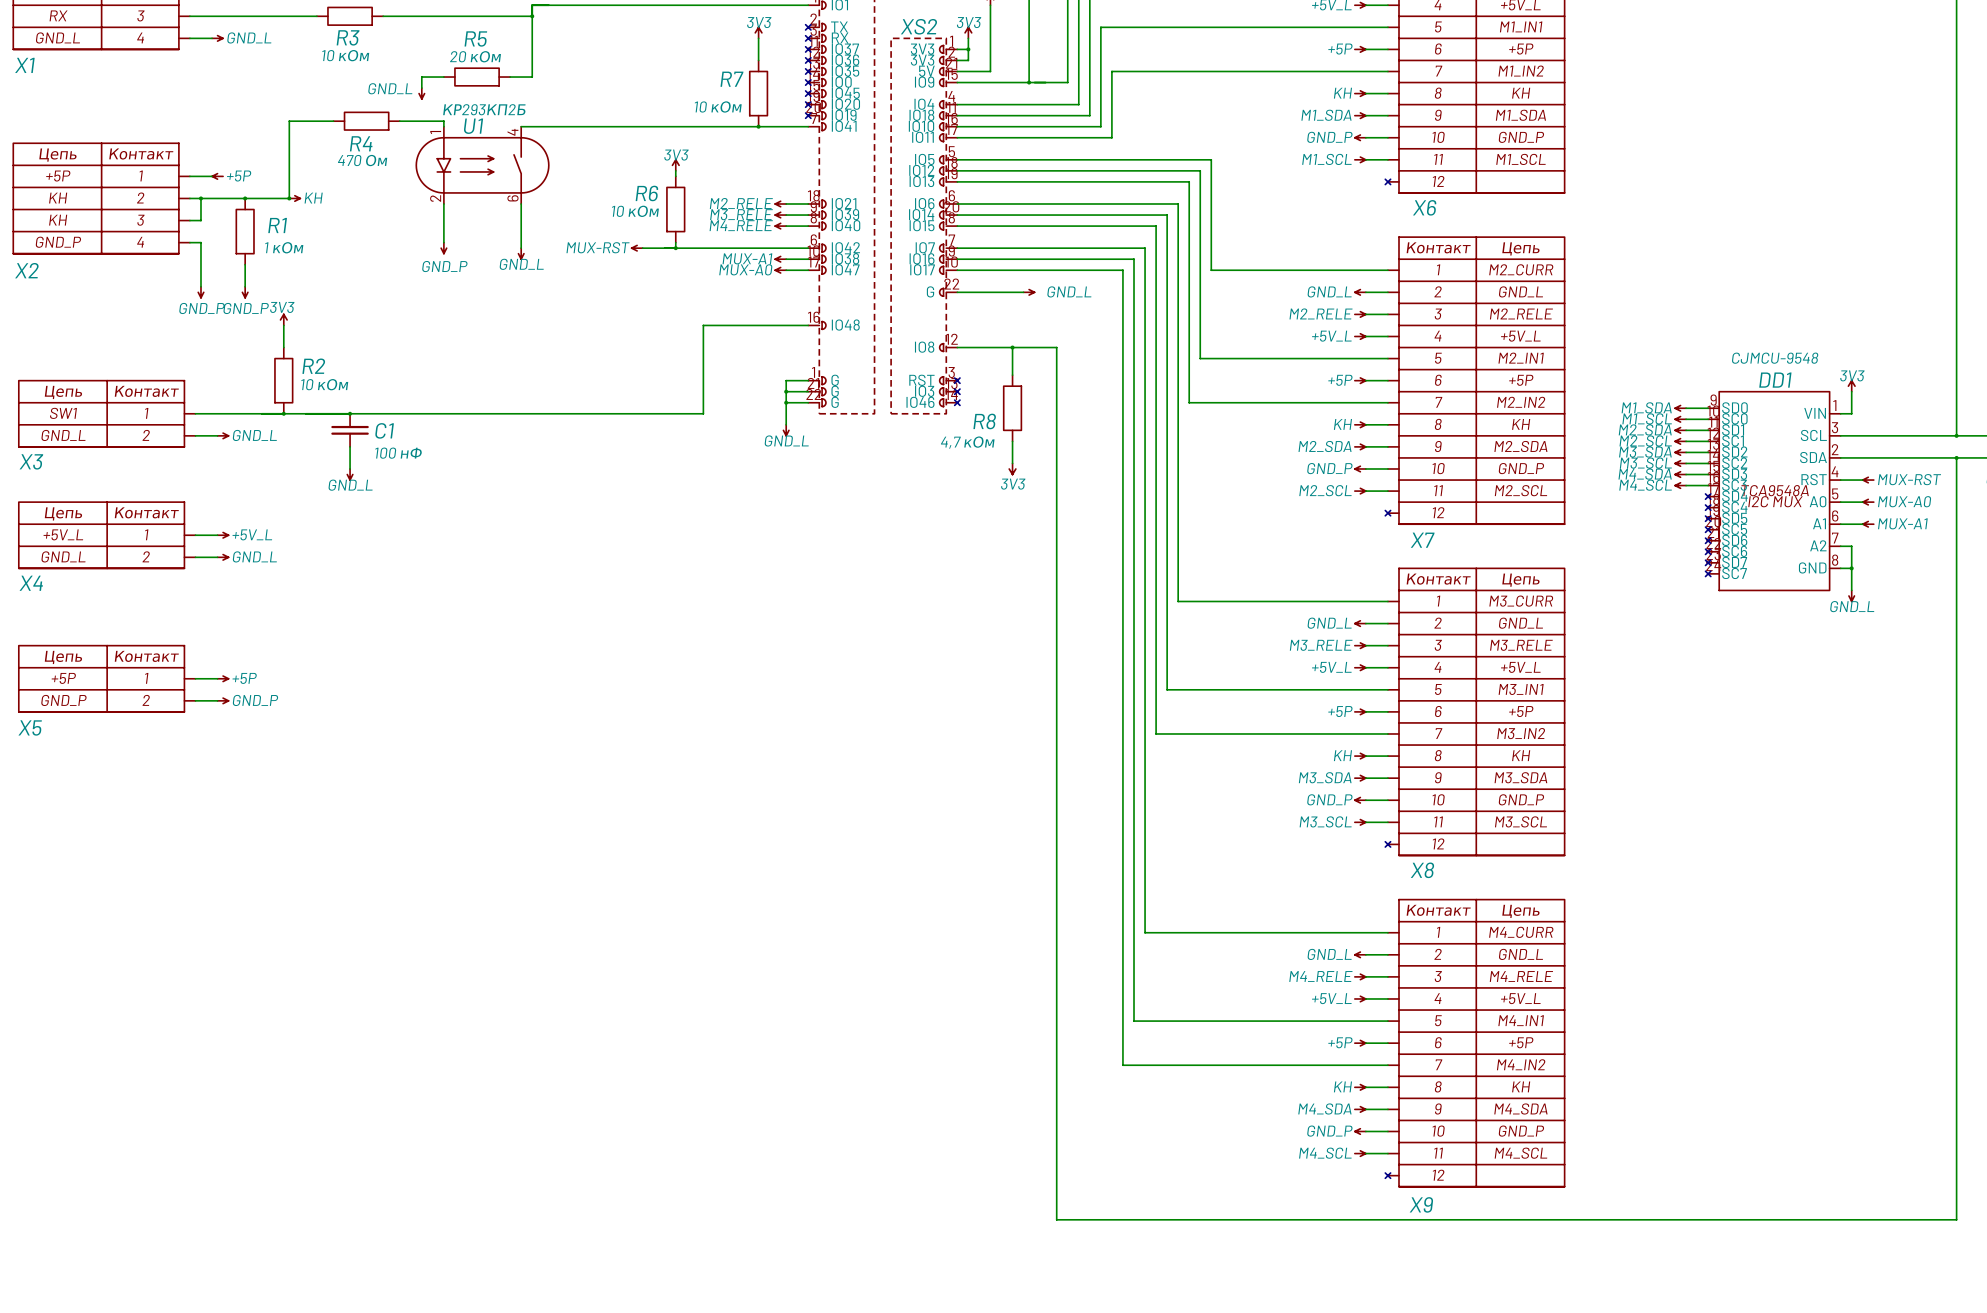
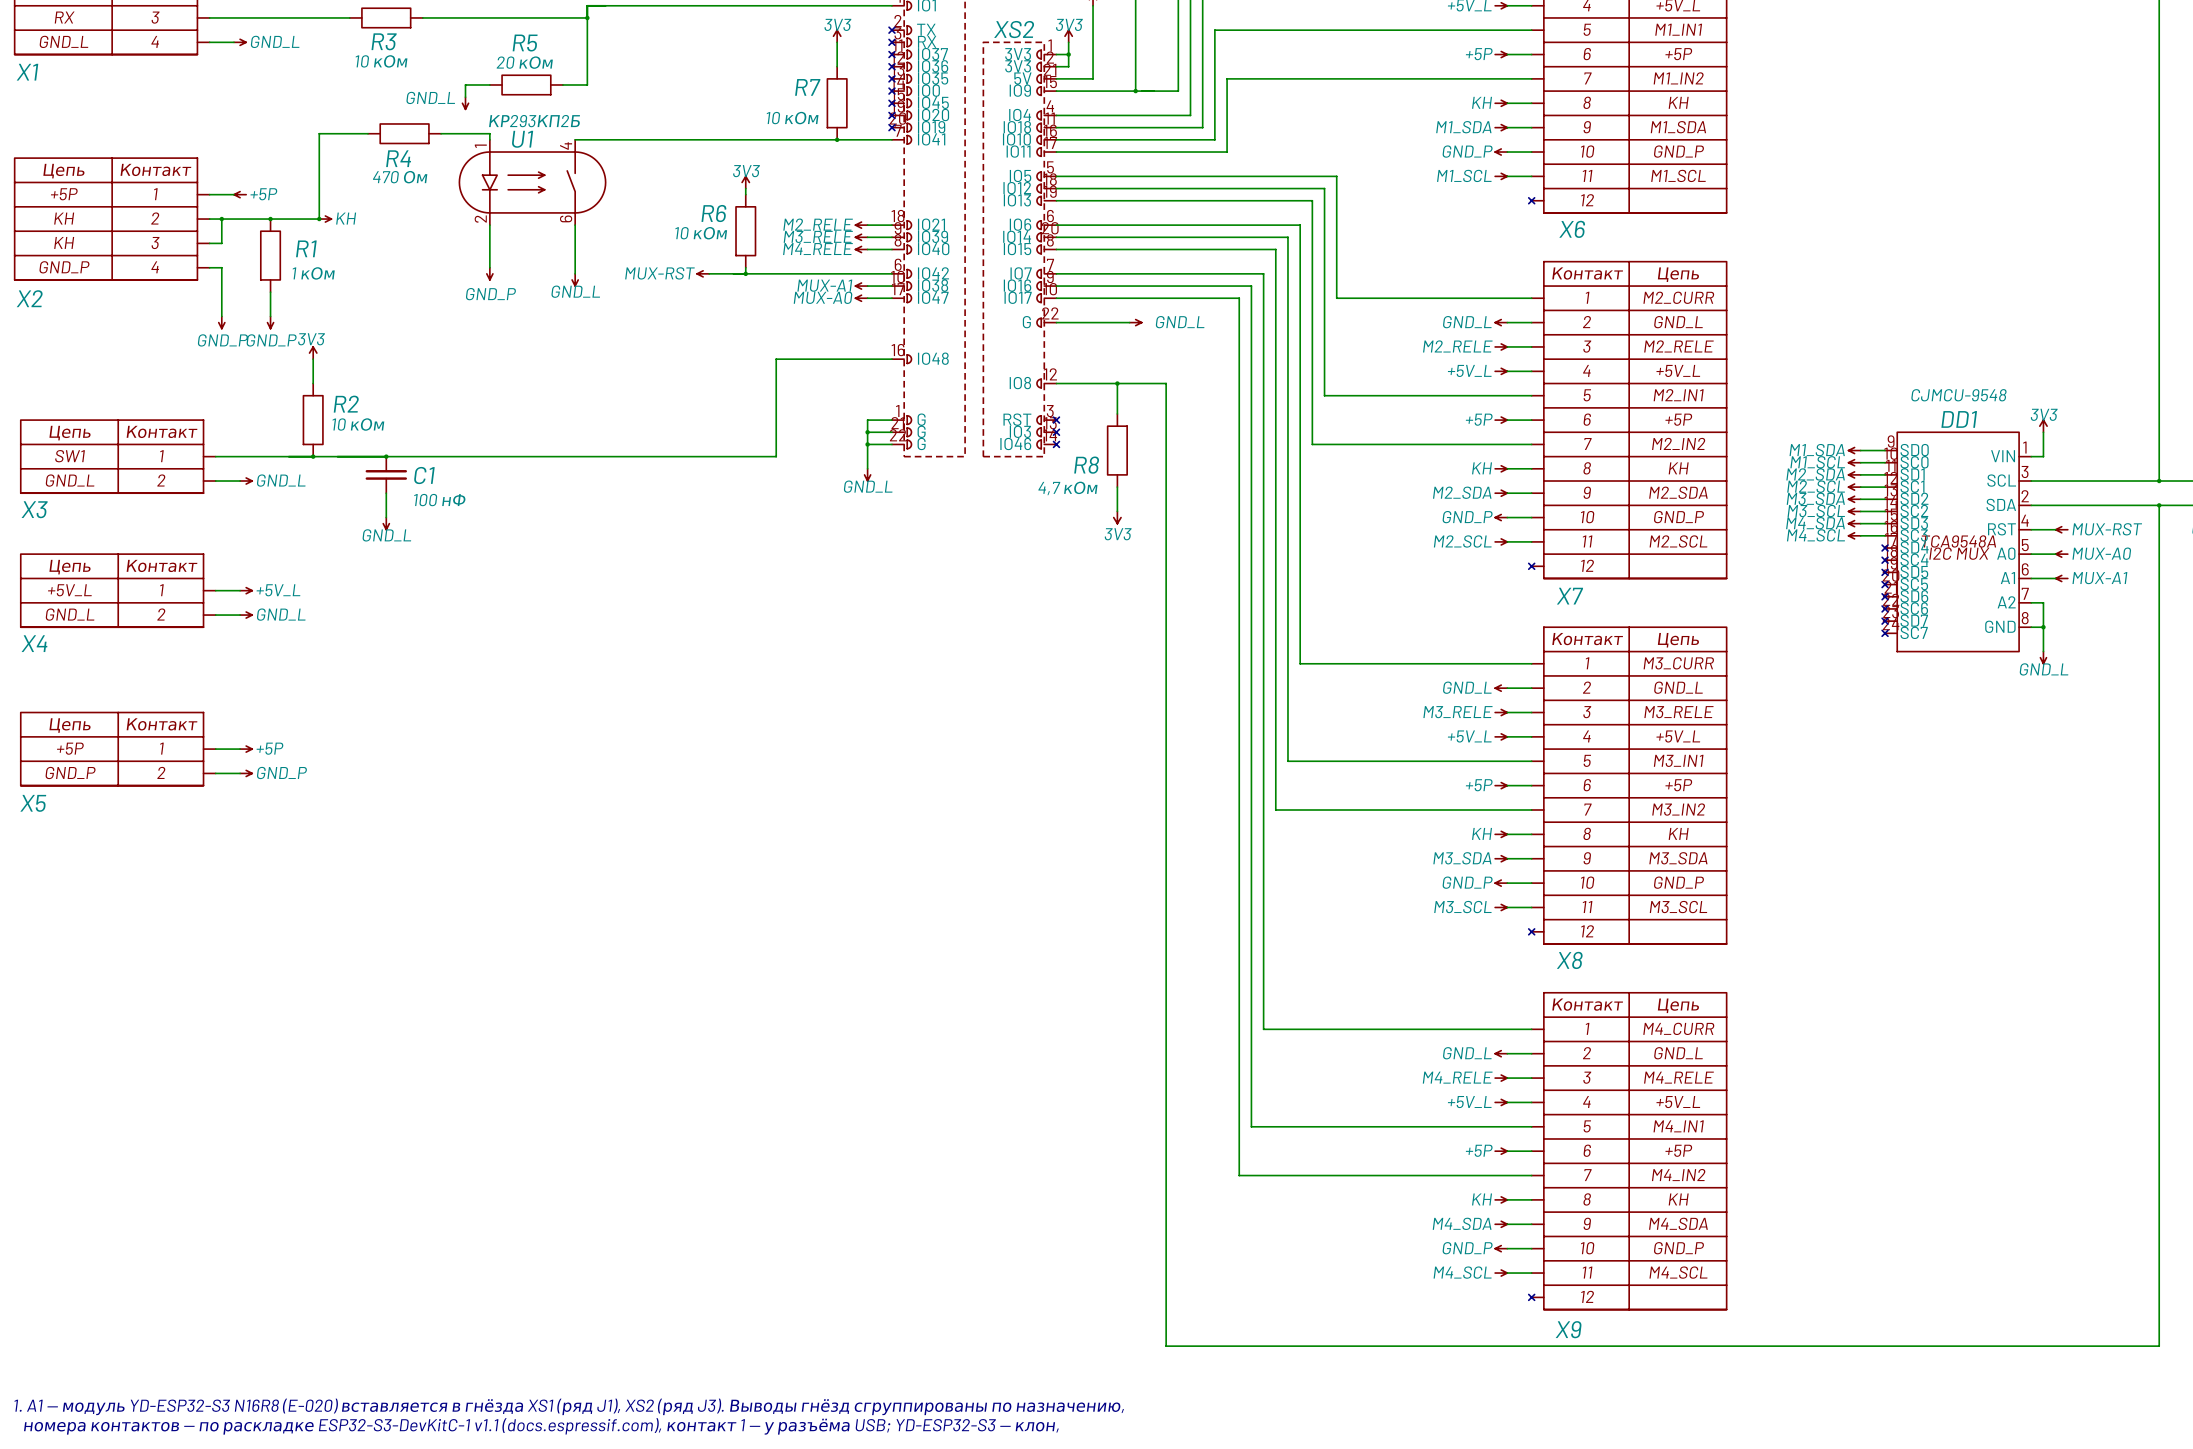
text: none -> 1. A1 — модуль YD-ESP32-S3 N16R8 (E-020) вставляется в гнёзда XS1 (ряд J1), XS2 (ряд J3). Выводы гнёзд сгруппированы по назначению, (569, 1406)
text: none -> номера контактов — по раскладке ESP32-S3-DevKitC-1 v1.1 (docs.espressif.com), контакт 1 — у разъёма USB; YD-ESP32-S3 — клон, (541, 1426)

